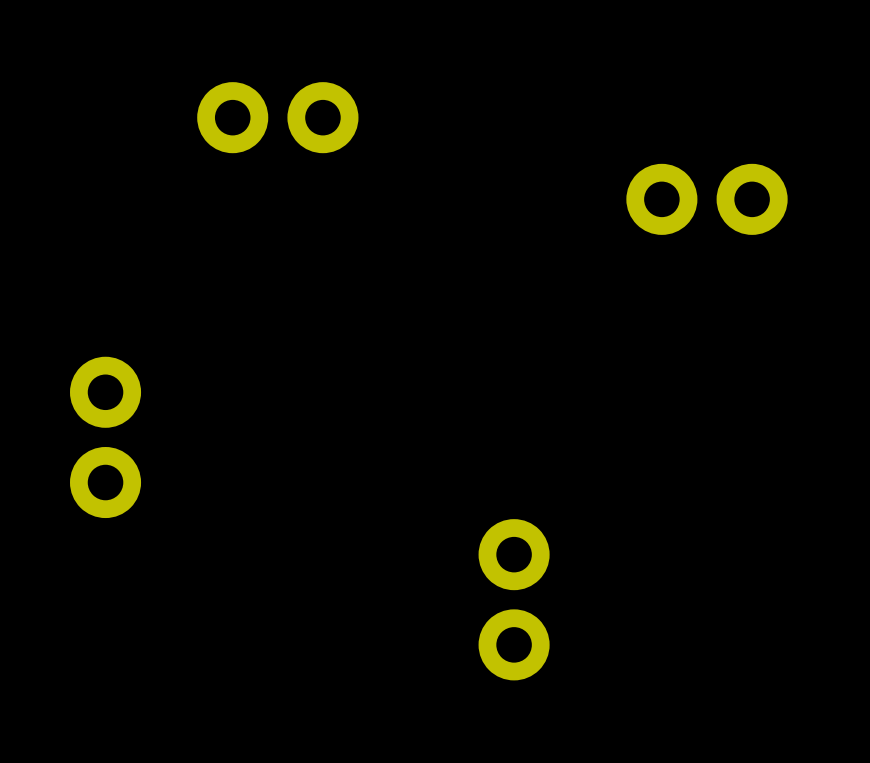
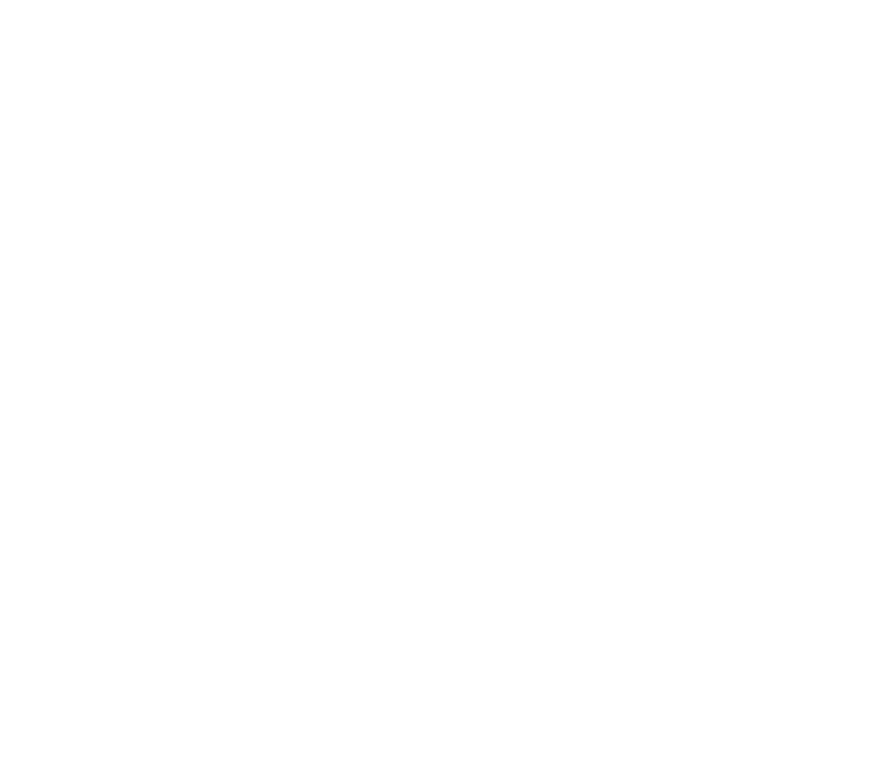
part: (277, 117) -> none
part: (707, 199) -> none
part: (105, 437) -> none
part: (514, 599) -> none

